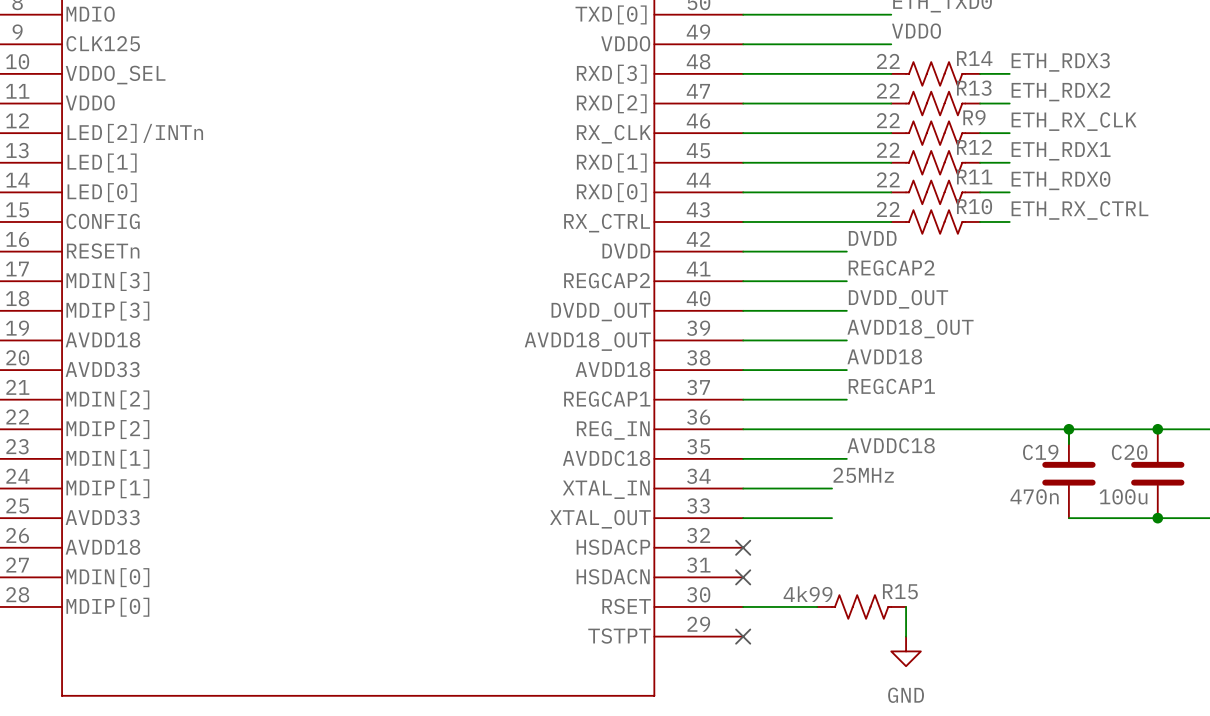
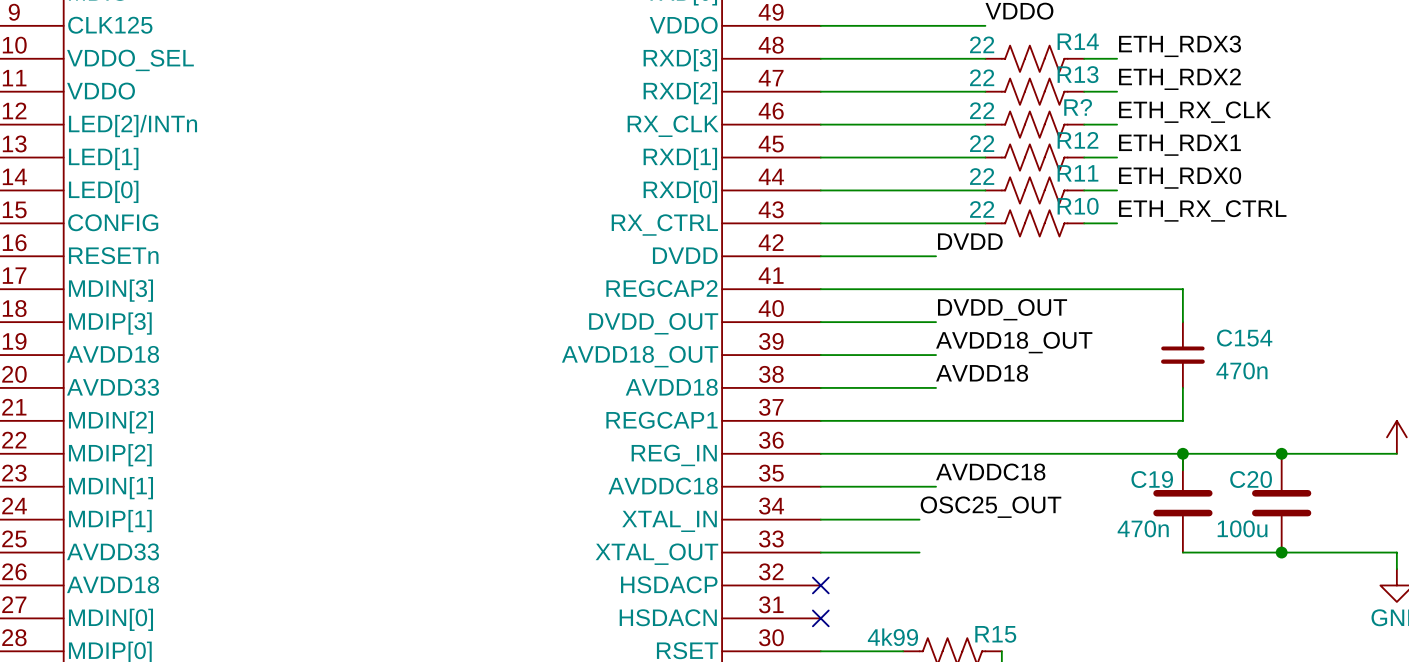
R9 name: R9 (974, 117) -> R? (1078, 107)
label: REGCAP2 (891, 268) -> none
wire: none -> (936, 289) (1182, 289) (1182, 322)
C154: none -> 470n (1182, 355)
wire: none -> (1182, 387) (1182, 420) (936, 420)
label: REGCAP1 (891, 386) -> none
label: 25MHz (863, 475) -> OSC25_OUT (990, 507)

